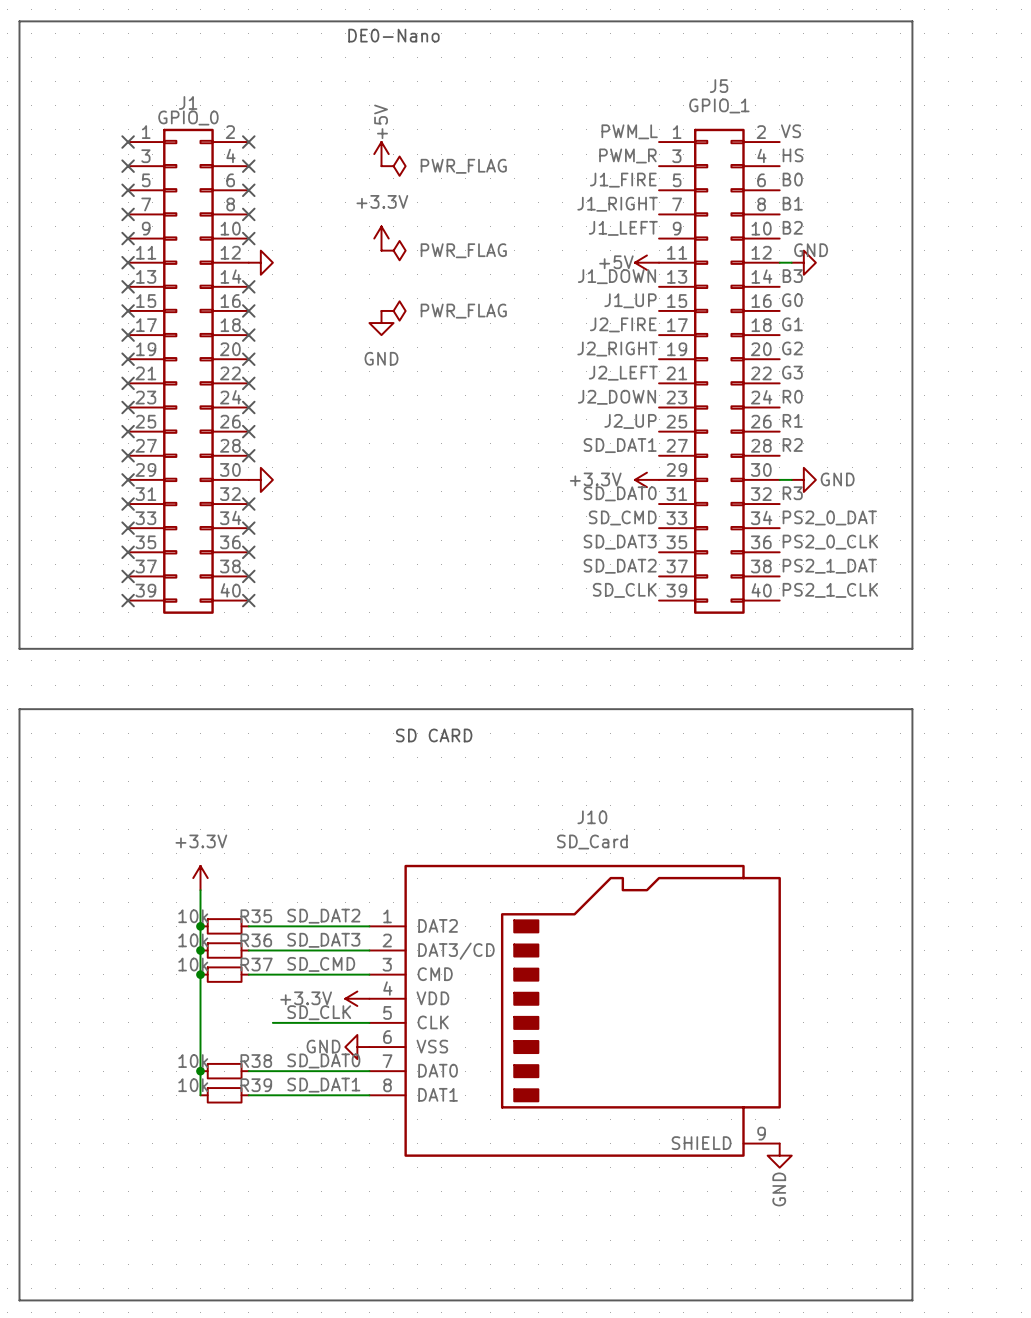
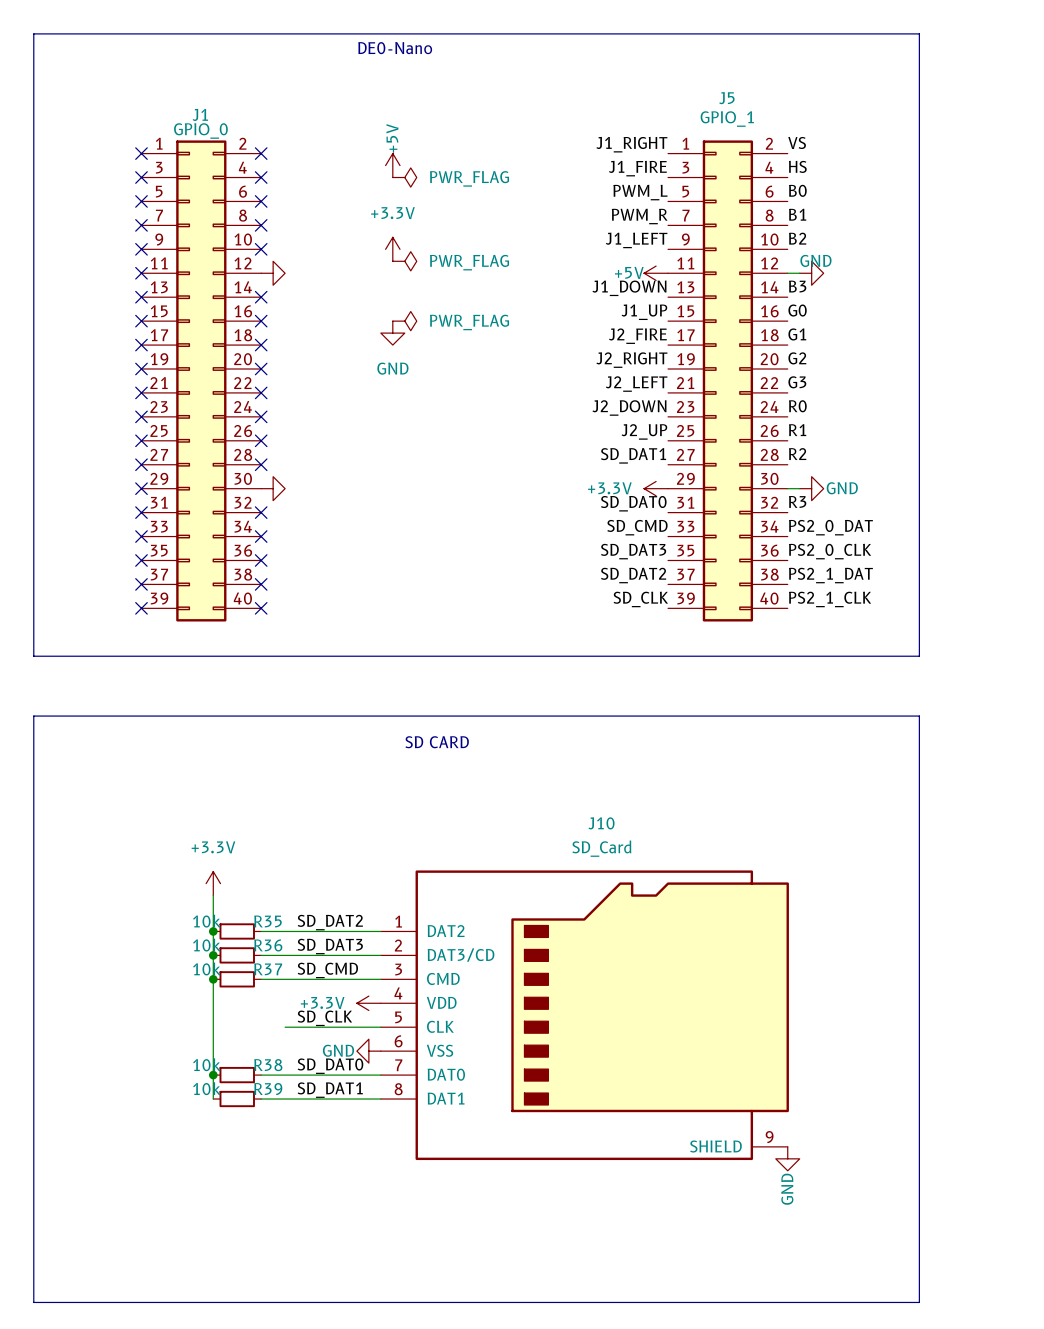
label: PWM_L (629, 131) -> J1_RIGHT (631, 144)
label: PWM_R (627, 155) -> J1_FIRE (637, 168)
label: J1_FIRE (623, 180) -> PWM_L (640, 192)
label: J1_RIGHT (617, 204) -> PWM_R (639, 216)

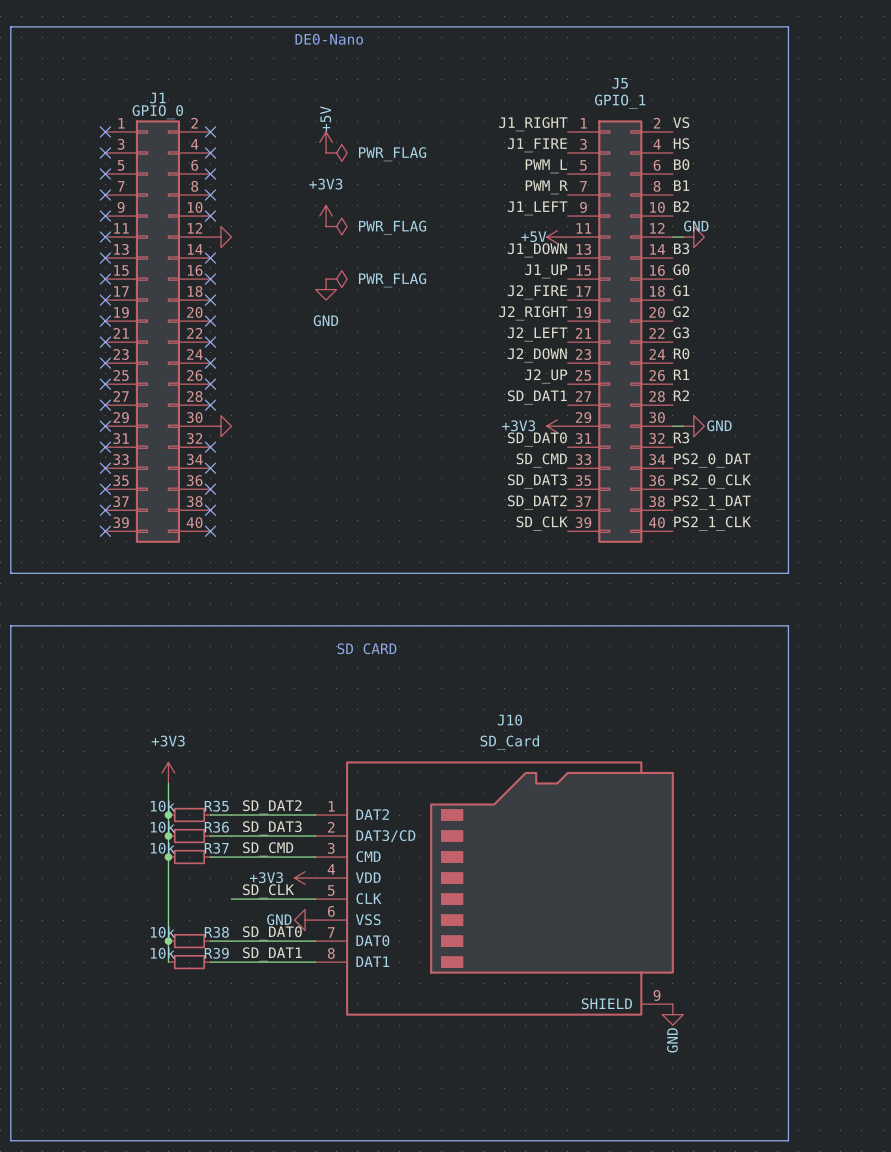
power symbol: +3.3V (392, 249) -> +3V3 (326, 216)
power symbol: +3.3V (656, 488) -> +3V3 (557, 426)
power symbol: +3.3V (213, 883) -> +3V3 (168, 772)
power symbol: +3.3V (368, 1003) -> +3V3 (305, 878)

